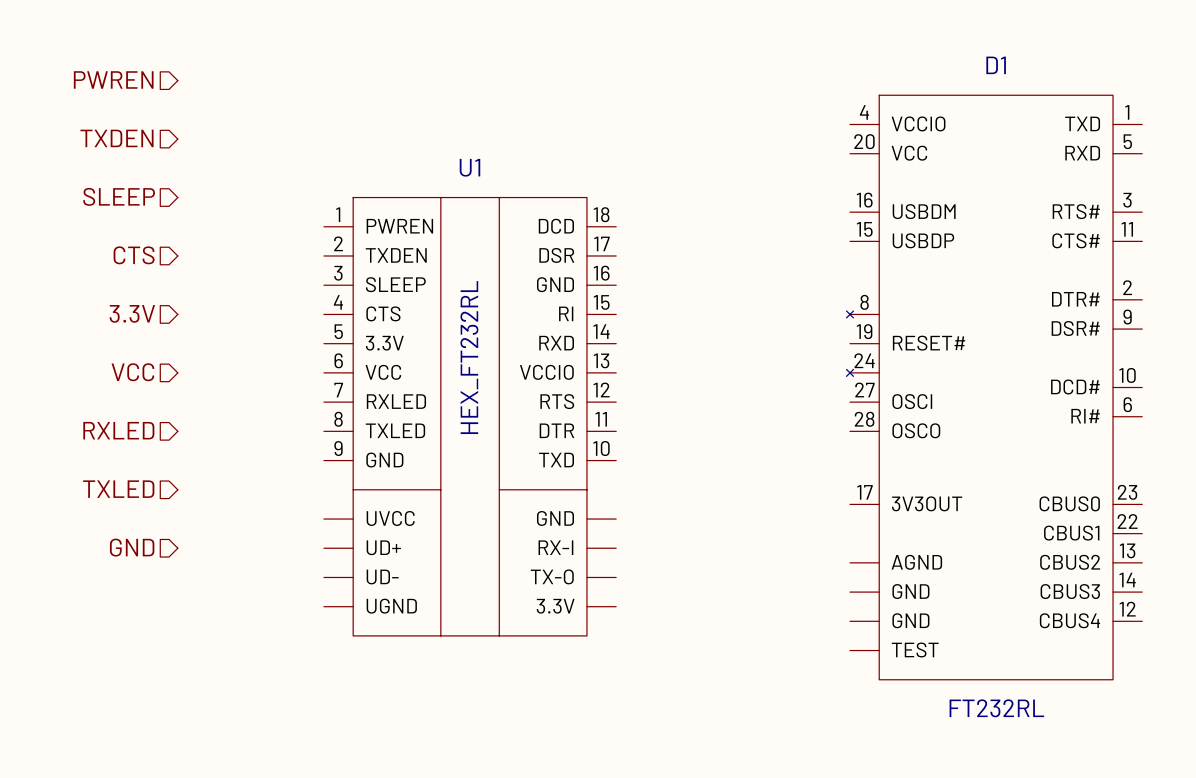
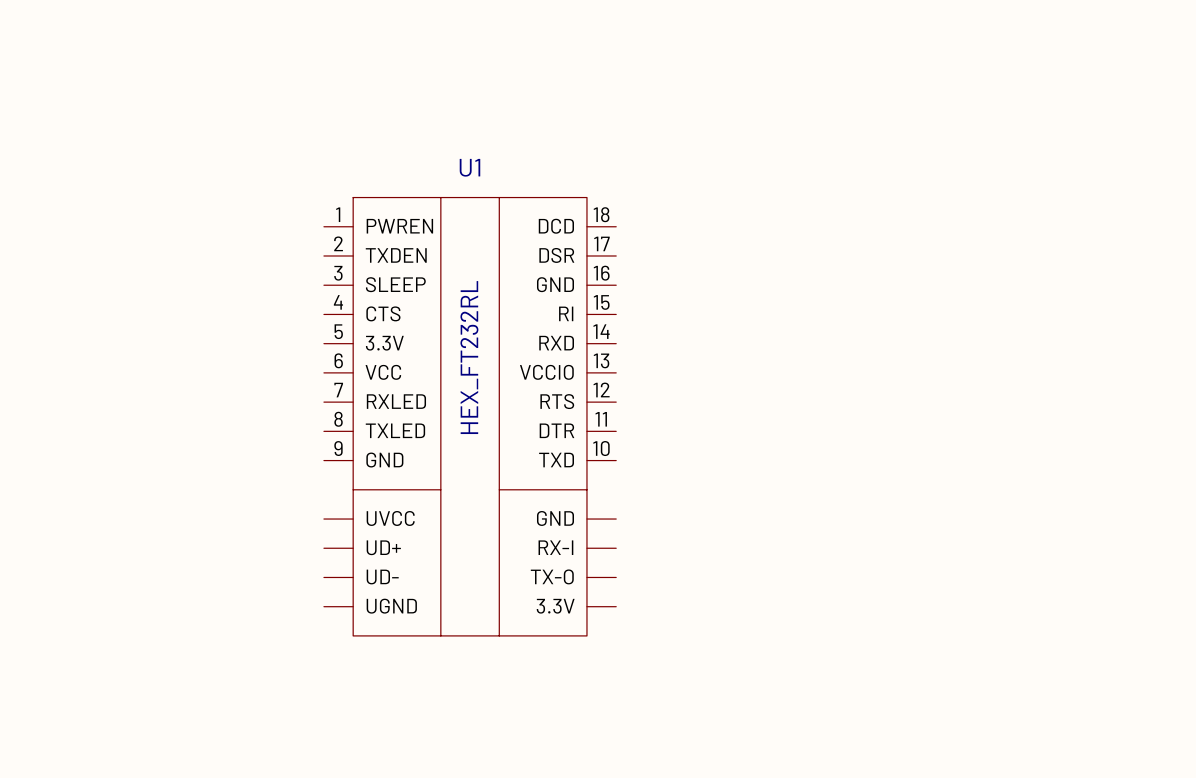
hierarchical label: PWREN (113, 79) -> none
hierarchical label: TXDEN (116, 138) -> none
hierarchical label: SLEEP (119, 196) -> none
hierarchical label: CTS (134, 255) -> none
hierarchical label: 3.3V (132, 313) -> none
hierarchical label: VCC (132, 372) -> none
D1: FT232RL (994, 387) -> none
hierarchical label: RXLED (118, 430) -> none
hierarchical label: TXLED (118, 489) -> none
hierarchical label: GND (132, 547) -> none

